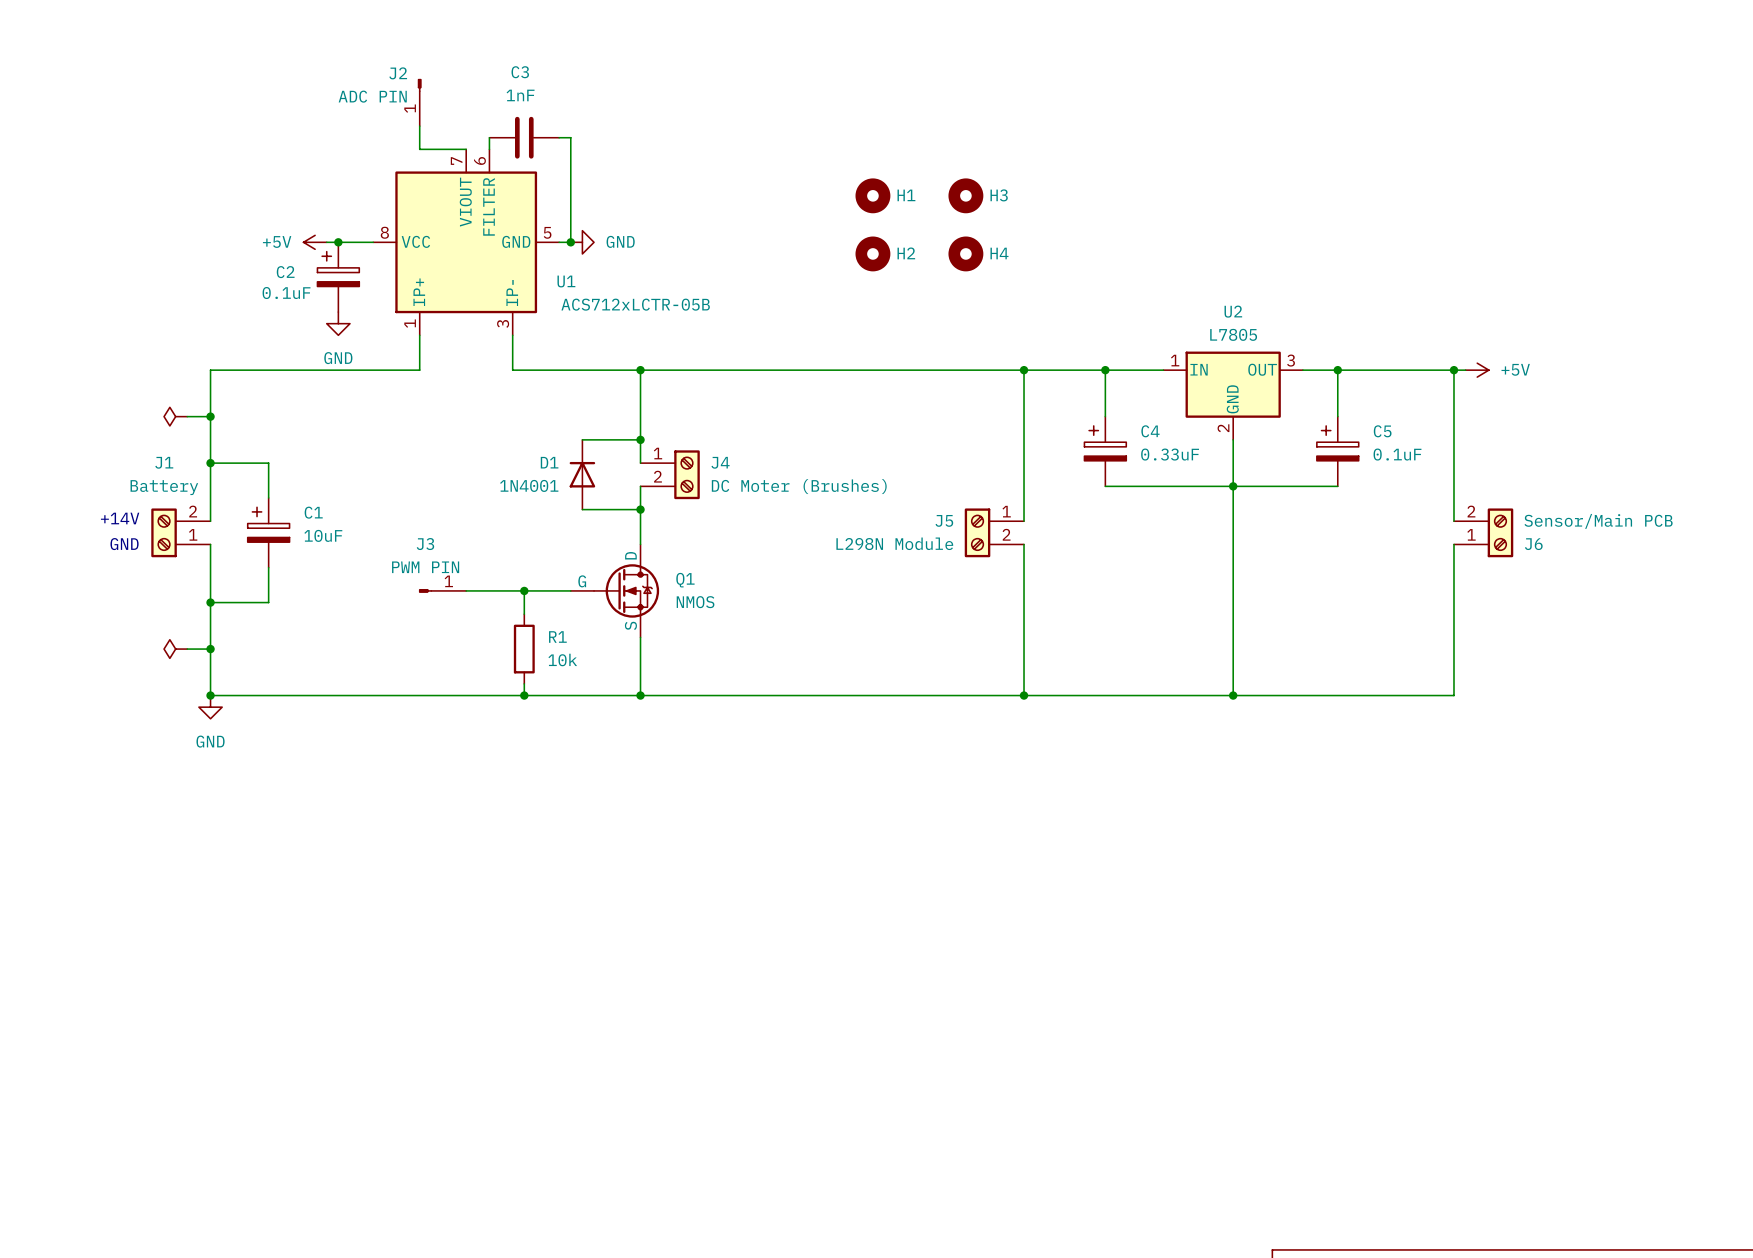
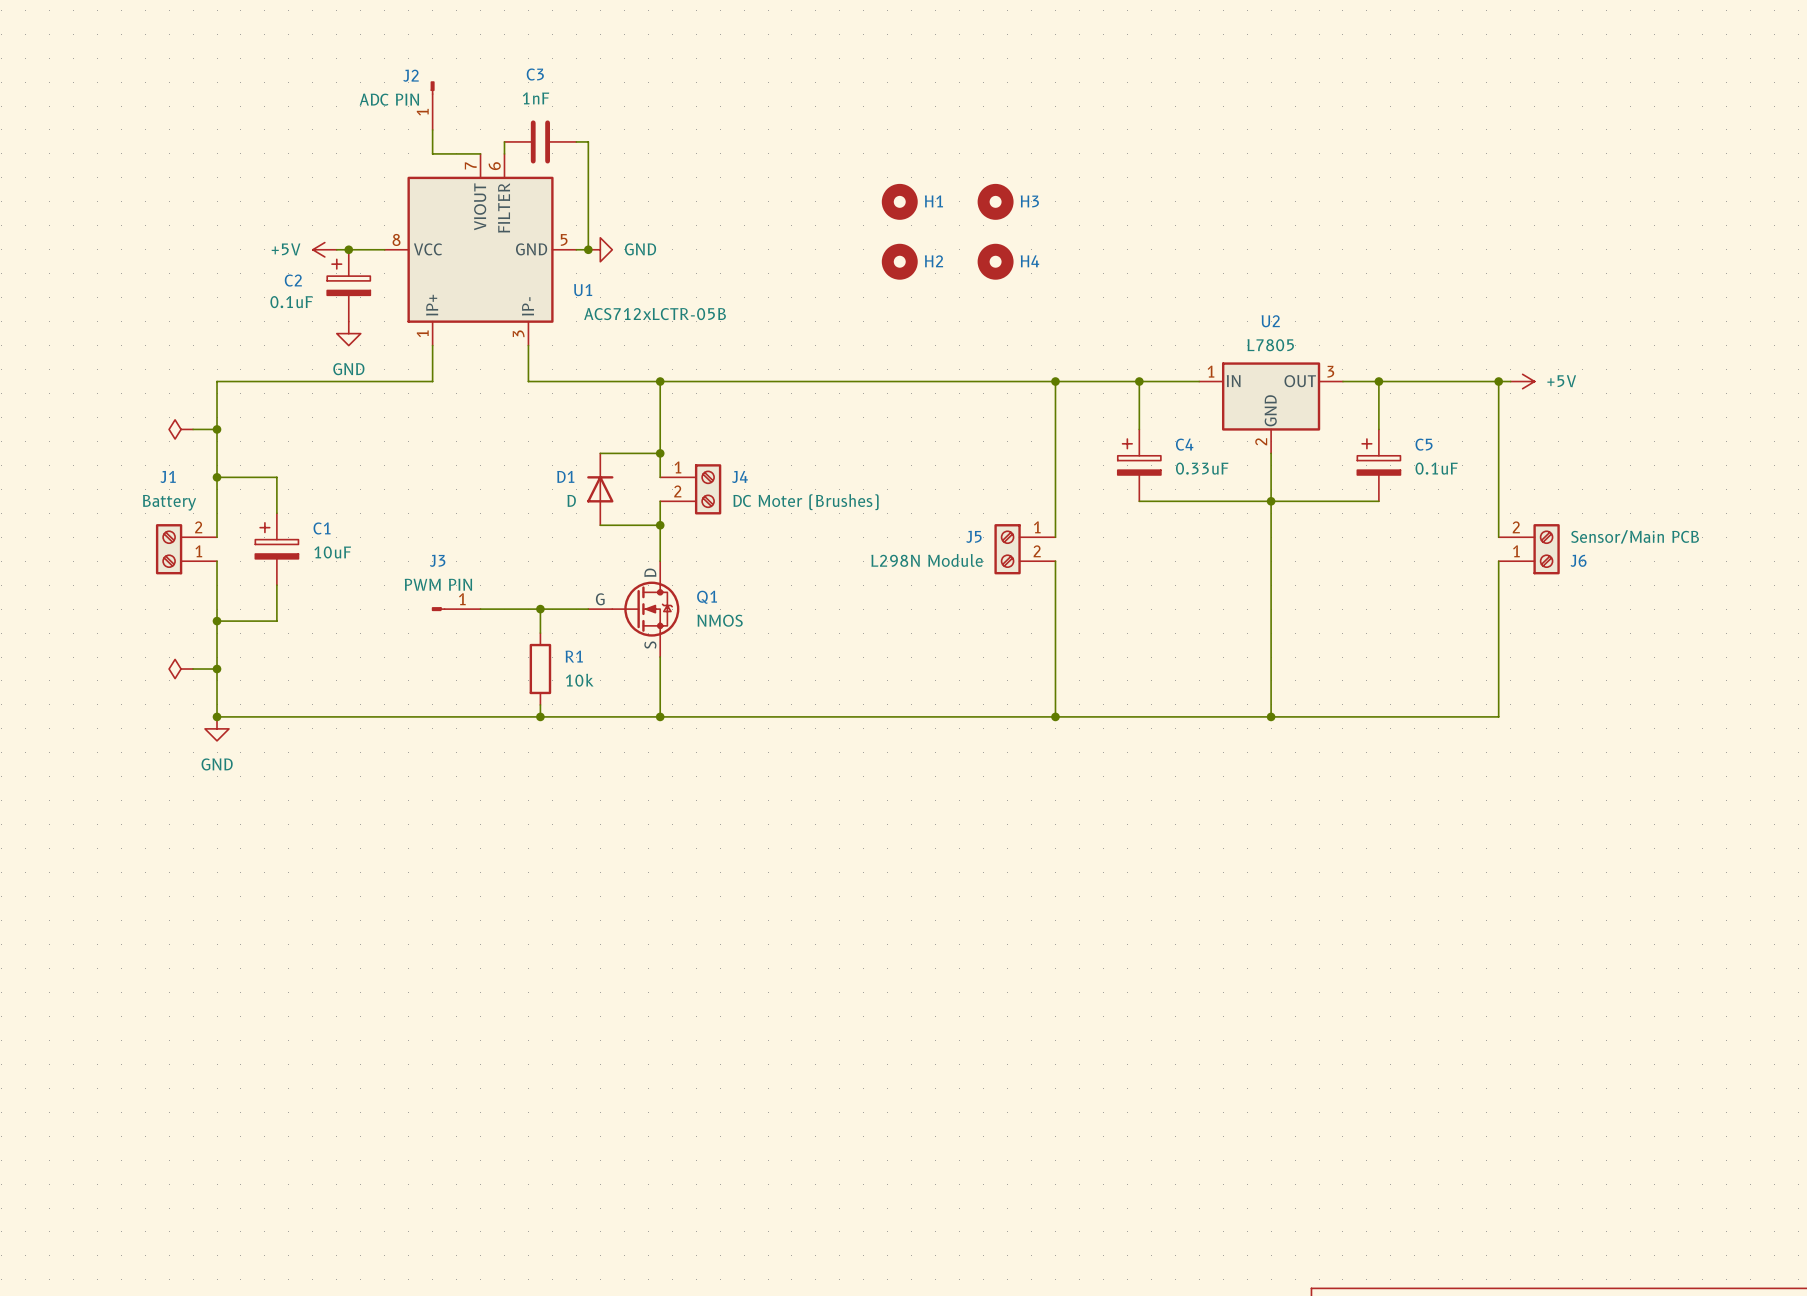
D1 value: 1N4001 (529, 485) -> D (571, 500)
text: +14V (120, 518) -> none
text: GND (124, 544) -> none

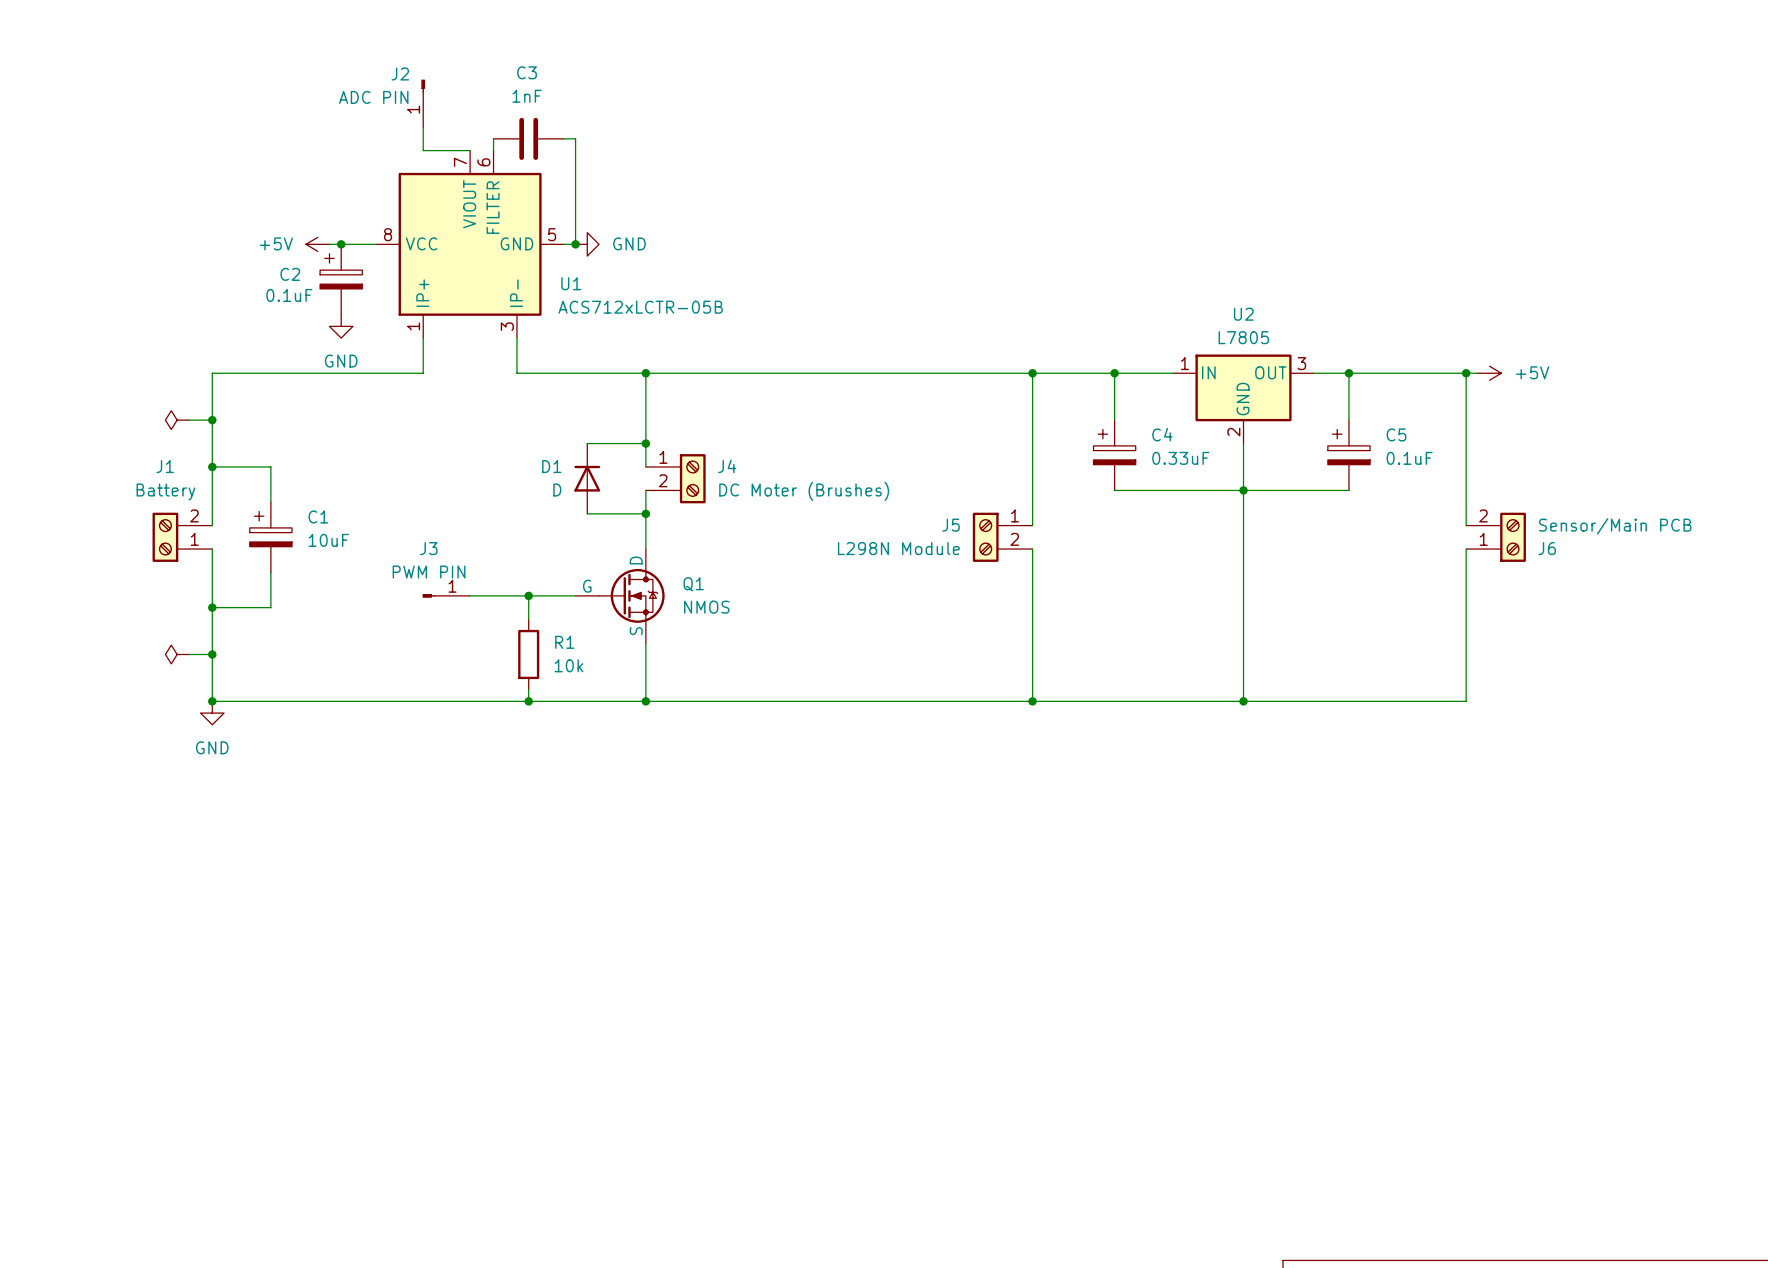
H1: (899, 201) -> none
H3: (995, 201) -> none
H2: (899, 261) -> none
H4: (995, 261) -> none

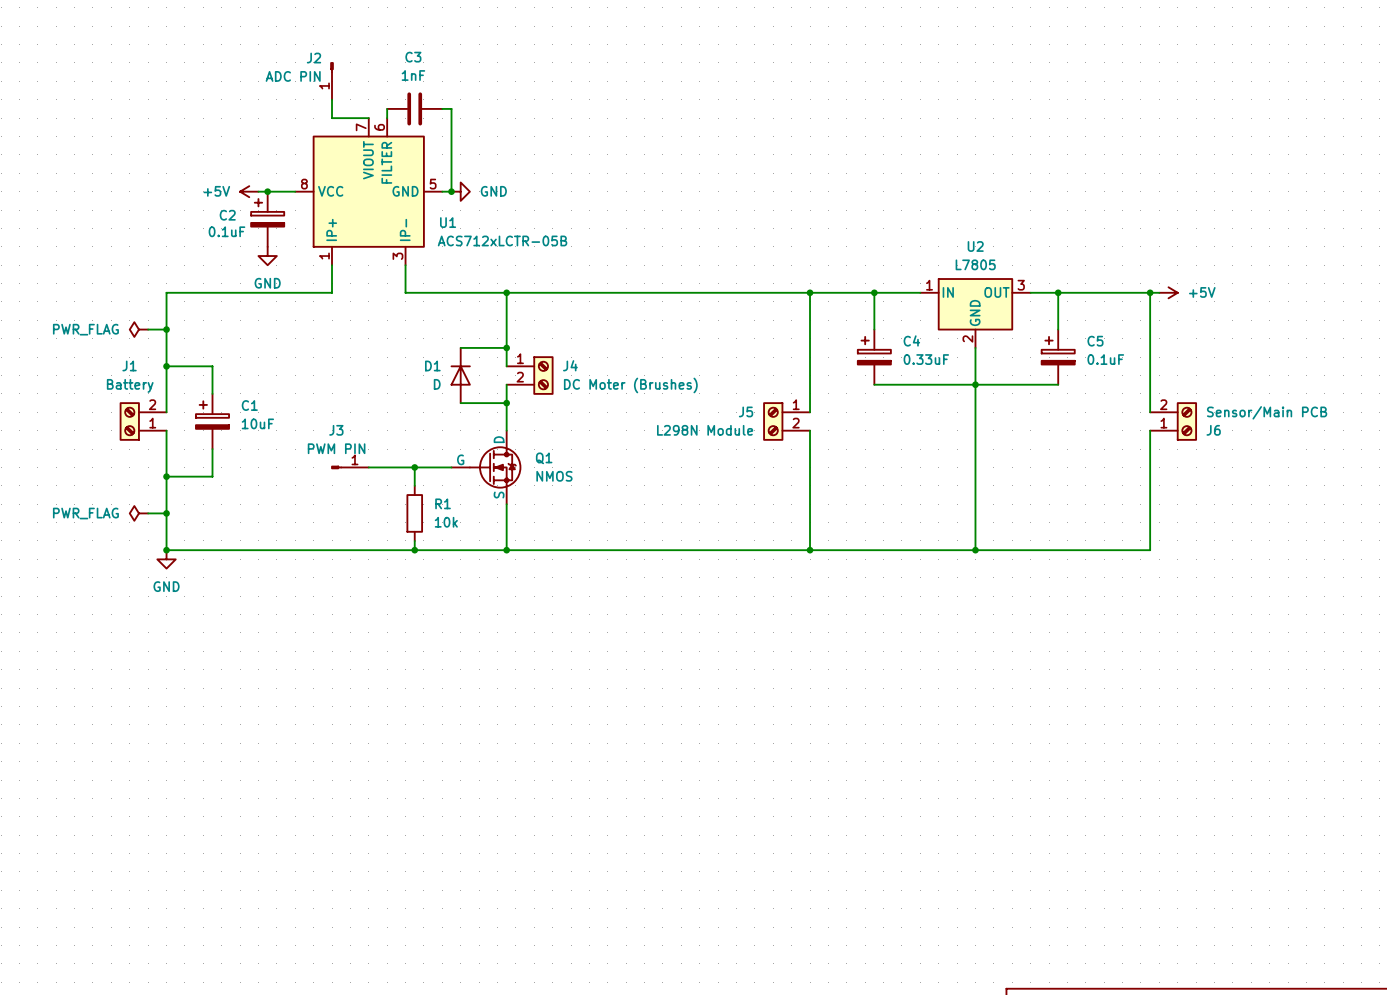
power symbol text: none -> PWR_FLAG (85, 329)
power symbol text: none -> PWR_FLAG (85, 513)

